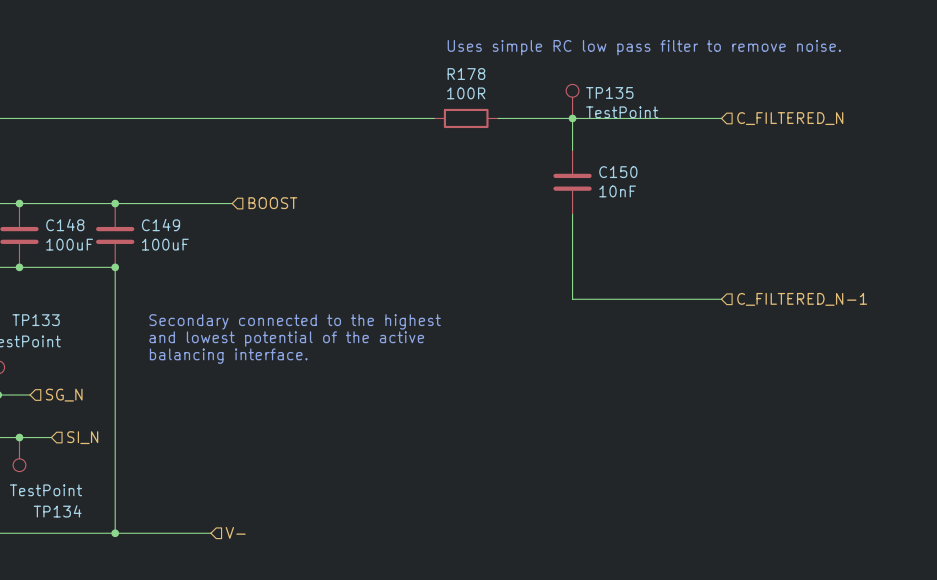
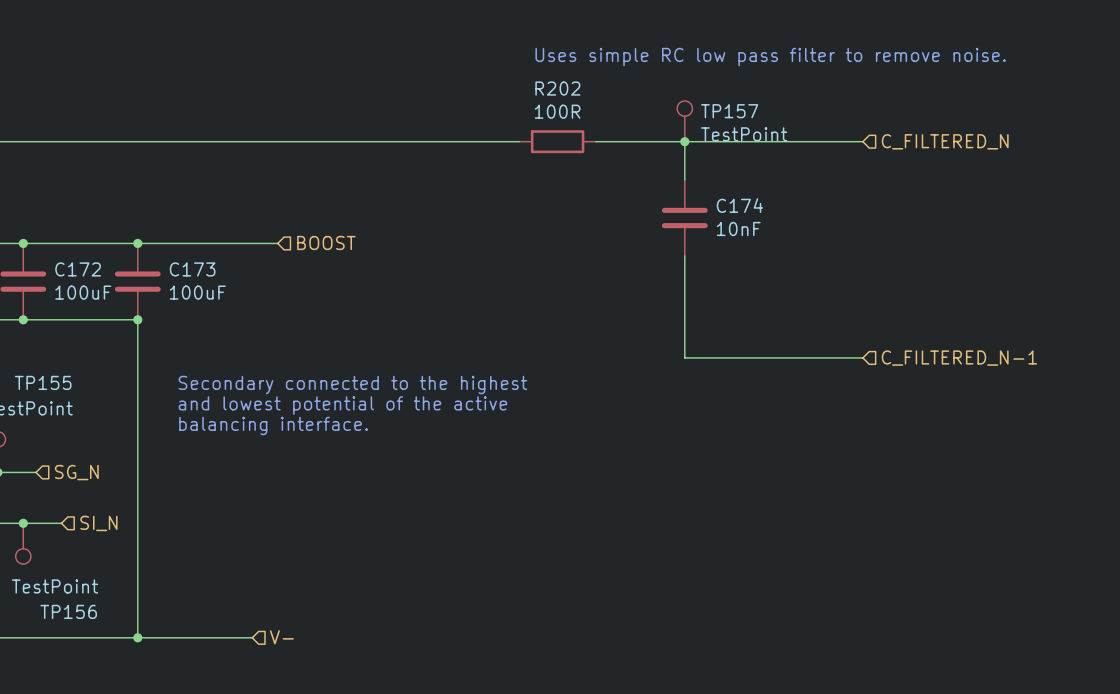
R178 name: R178 (466, 74) -> R202 (557, 88)
TP135 name: TP135 (609, 92) -> TP157 (729, 111)
C150 name: C150 (618, 172) -> C174 (739, 205)
C148 name: C148 (65, 225) -> C172 (78, 269)
C149 name: C149 (161, 225) -> C173 (192, 269)
TP133 name: TP133 (36, 320) -> TP155 (43, 382)
TP134 name: TP134 (57, 511) -> TP156 (68, 611)

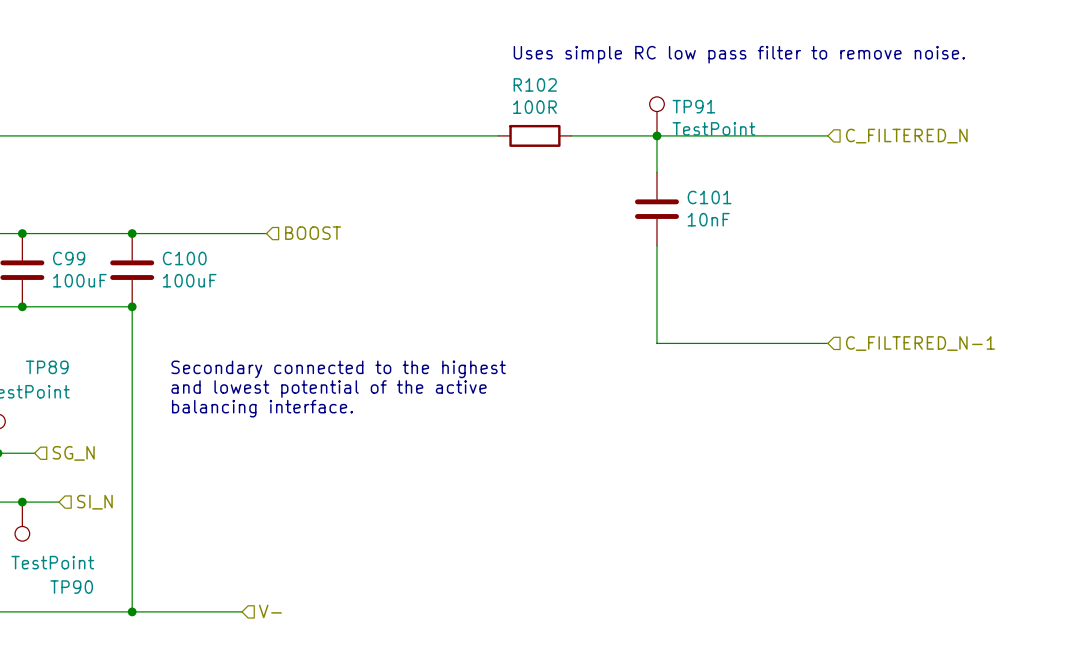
R202 name: R202 (557, 88) -> R102 (535, 84)
TP157 name: TP157 (729, 111) -> TP91 (693, 106)
C174 name: C174 (739, 205) -> C101 (709, 197)
C172 name: C172 (78, 269) -> C99 (69, 258)
C173 name: C173 (192, 269) -> C100 (184, 258)
TP155 name: TP155 (43, 382) -> TP89 (47, 367)
TP156 name: TP156 (68, 611) -> TP90 (71, 587)

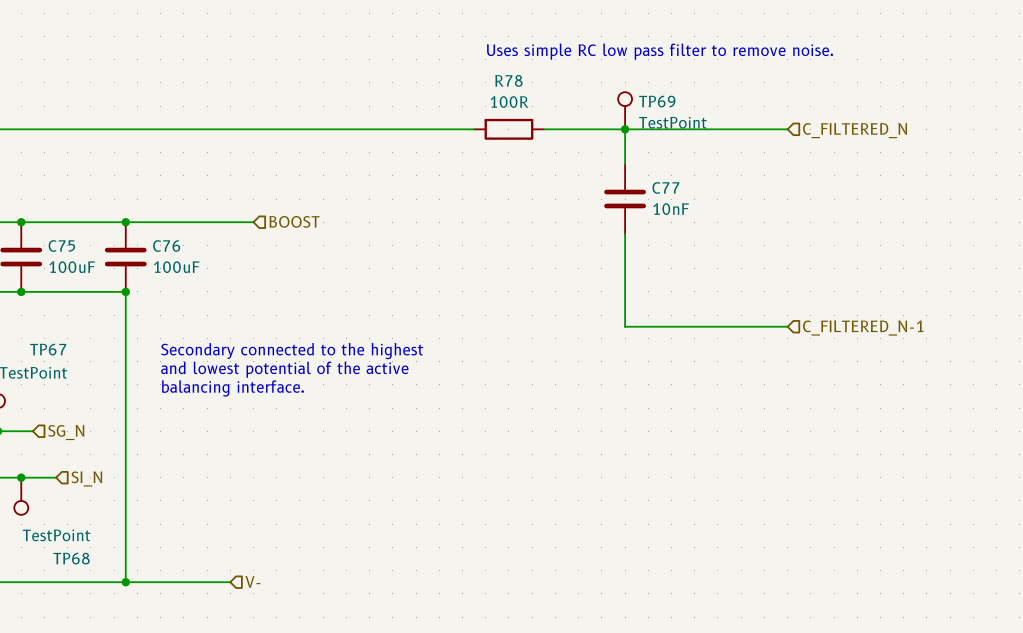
R102 name: R102 (535, 84) -> R78 (508, 80)
TP91 name: TP91 (693, 106) -> TP69 (657, 101)
C101 name: C101 (709, 197) -> C77 (665, 187)
C99 name: C99 (69, 258) -> C75 (61, 246)
C100 name: C100 (184, 258) -> C76 (166, 246)
TP89 name: TP89 (47, 367) -> TP67 (48, 349)
TP90 name: TP90 (71, 587) -> TP68 (71, 558)

